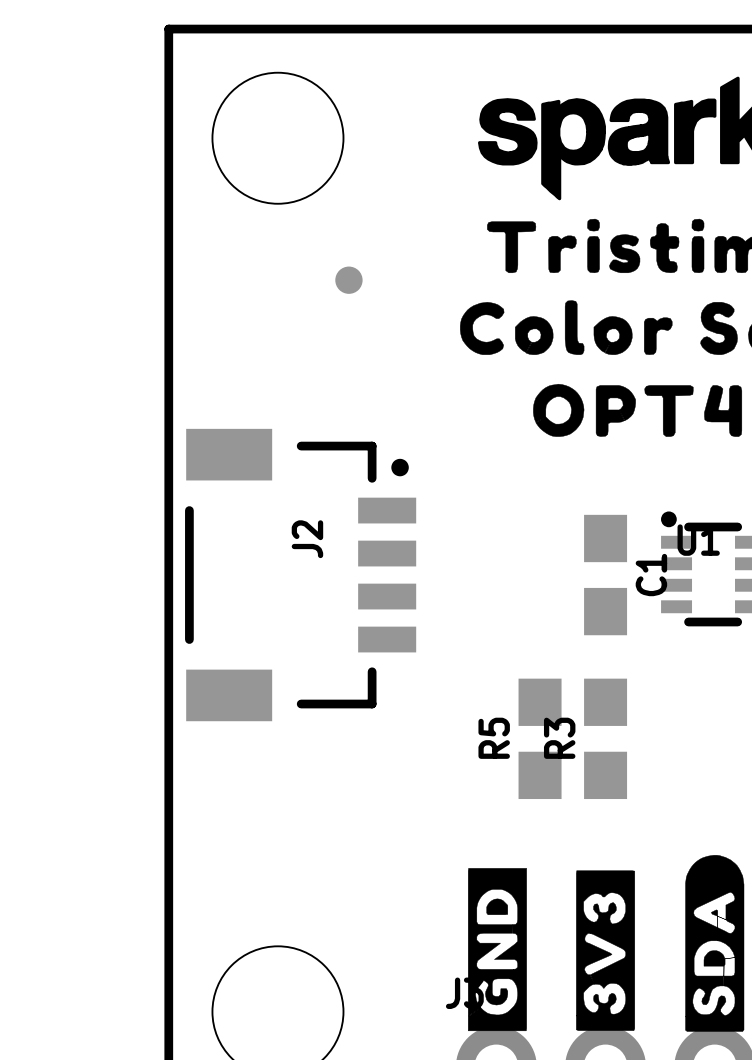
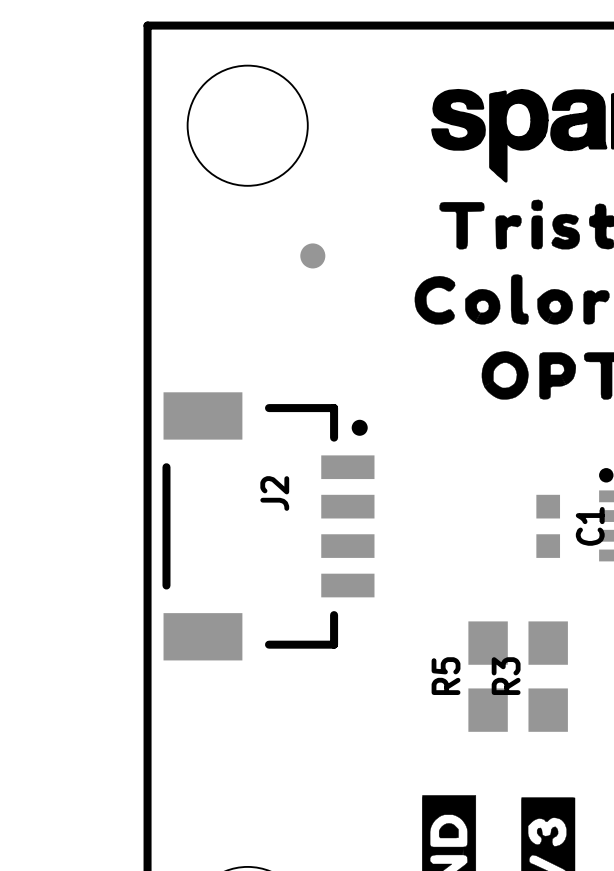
C1 footprint: [584, 514, 628, 636] -> [536, 494, 561, 558]

